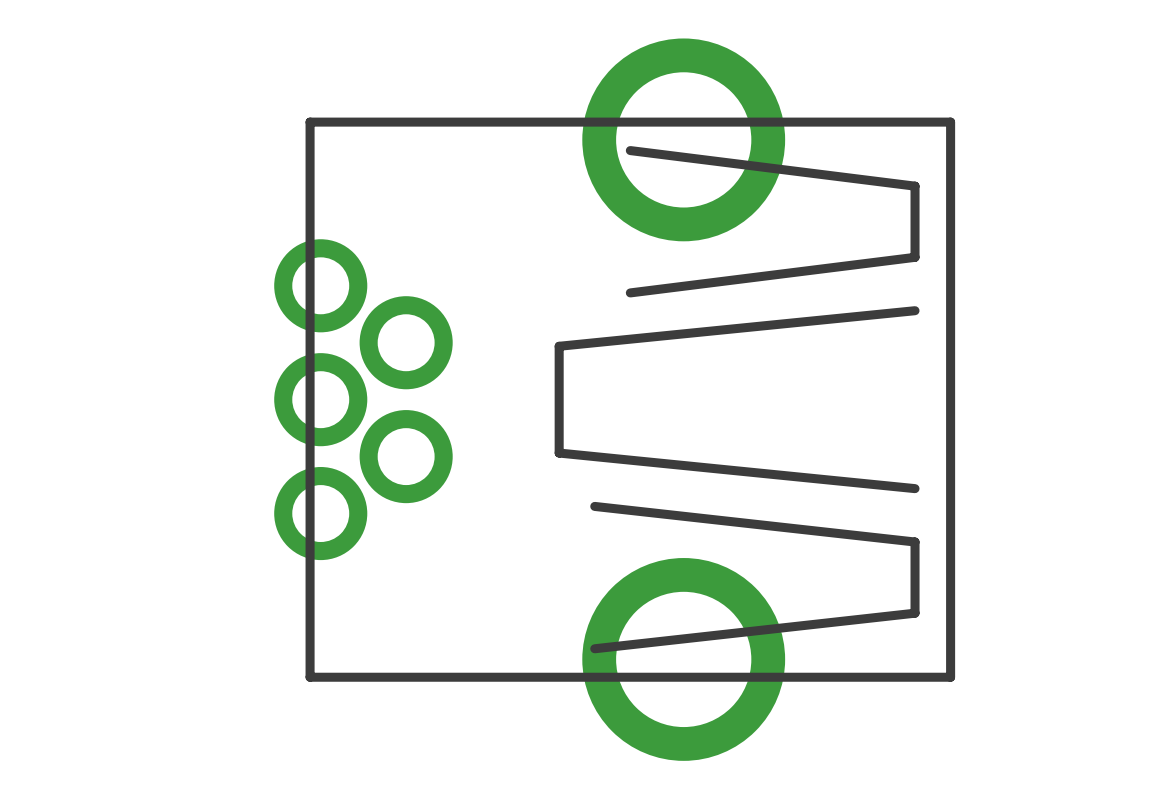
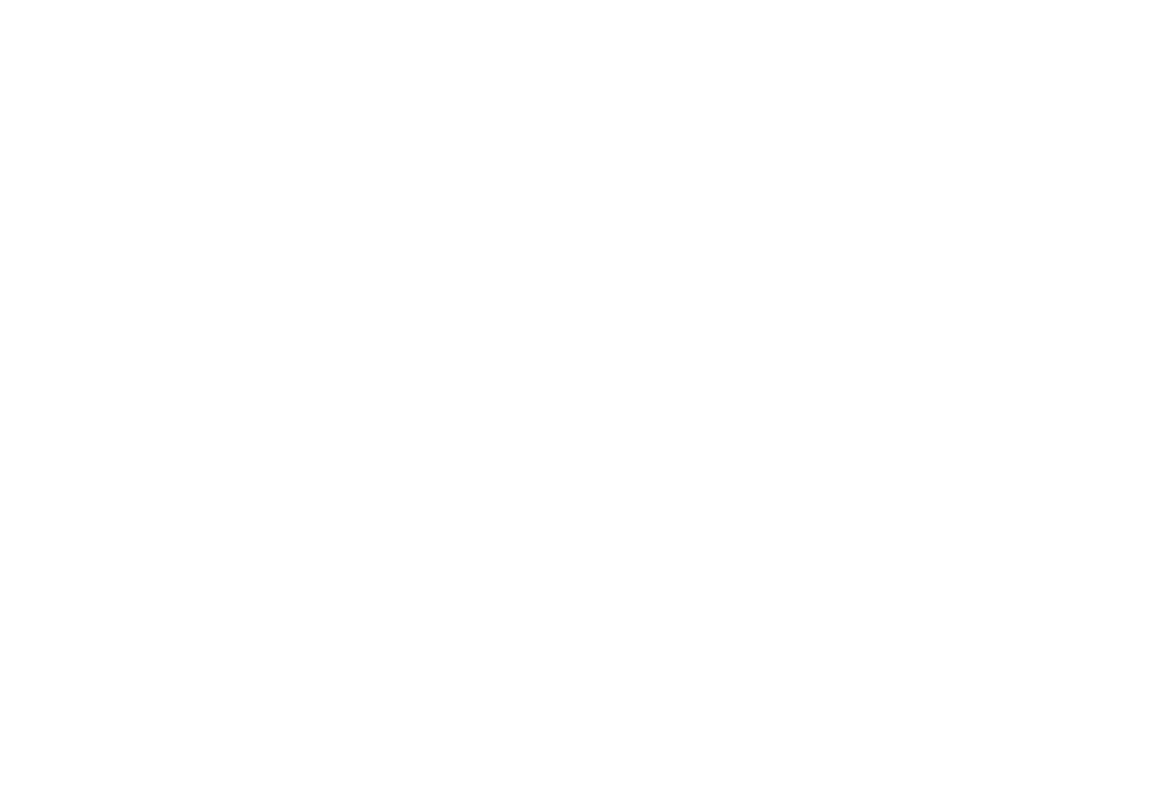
part: (614, 399) -> none

